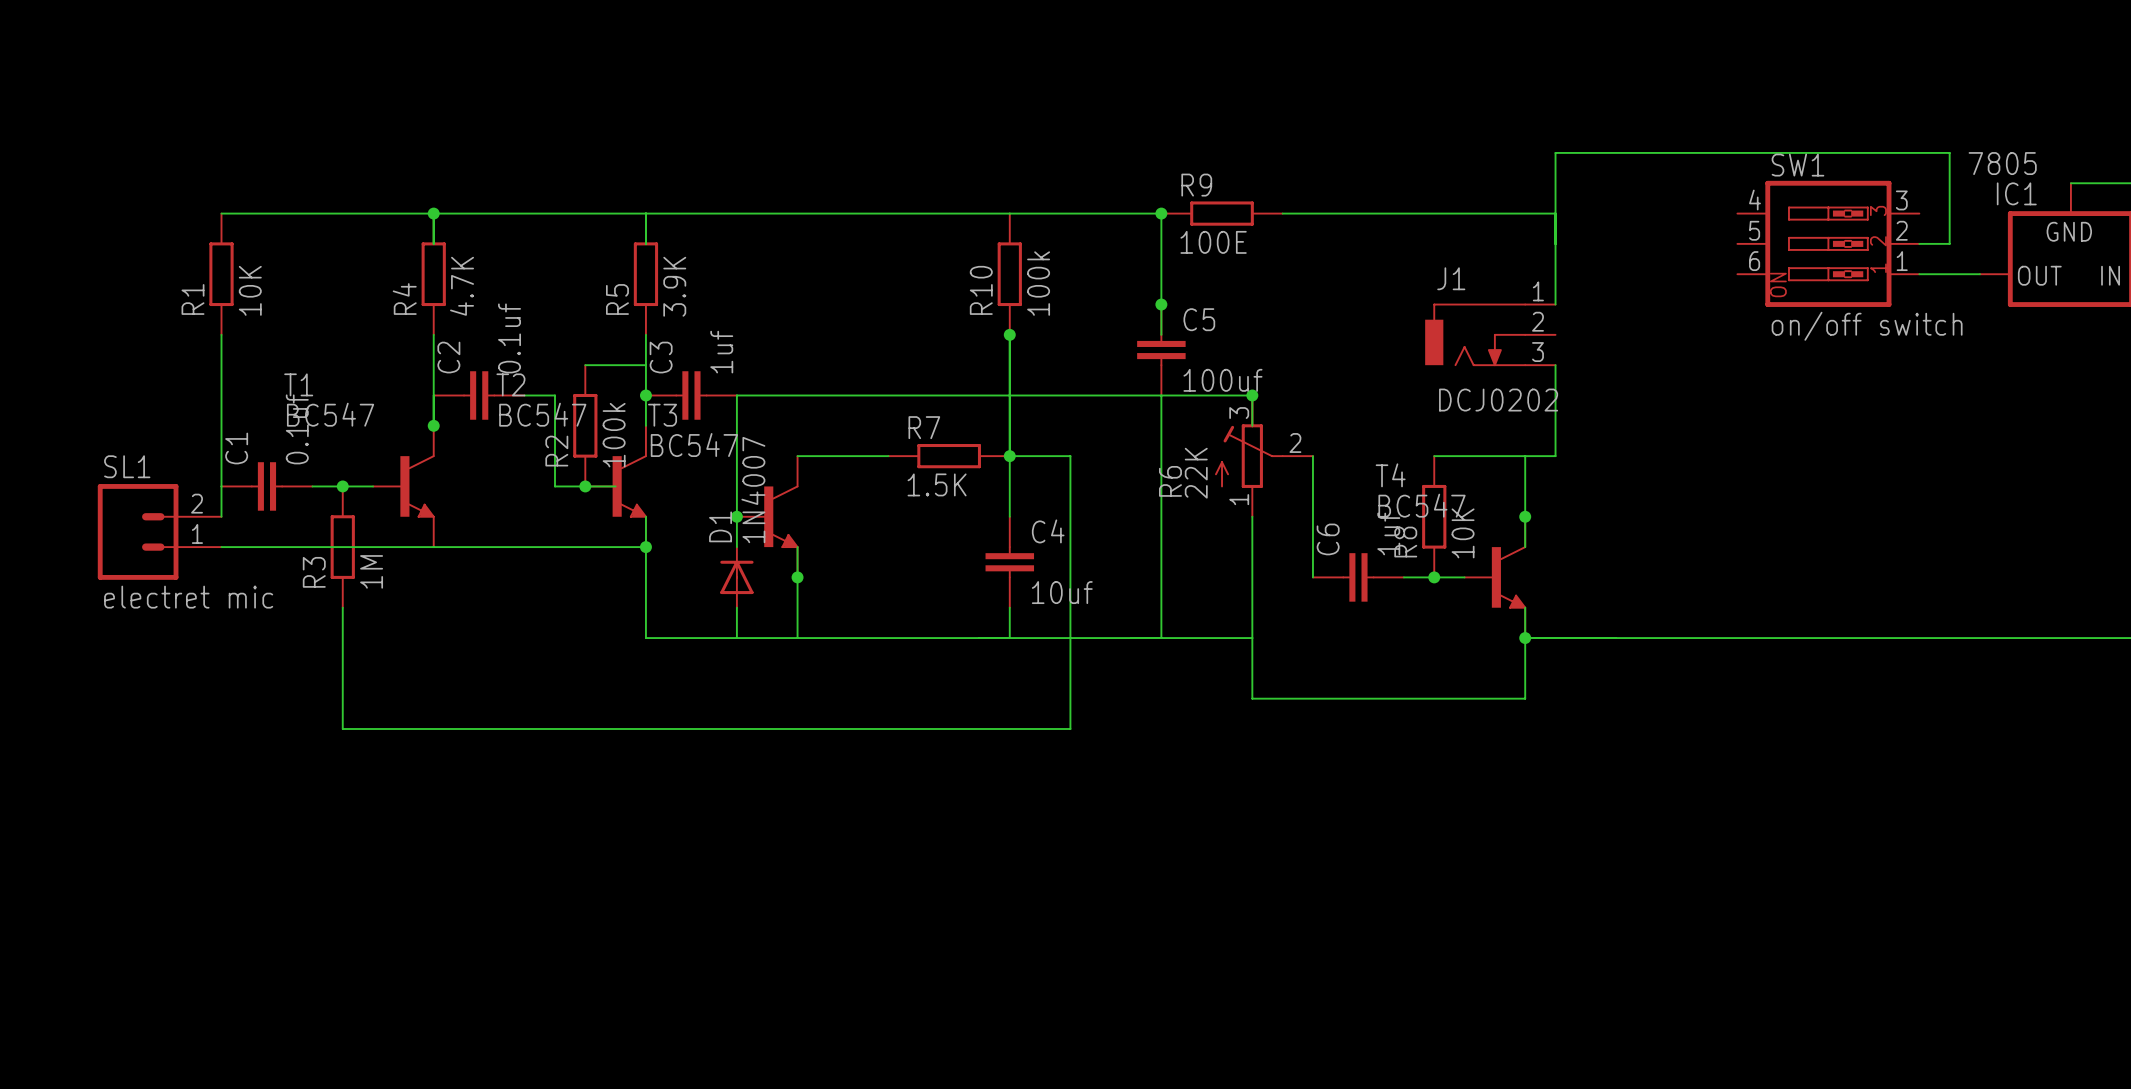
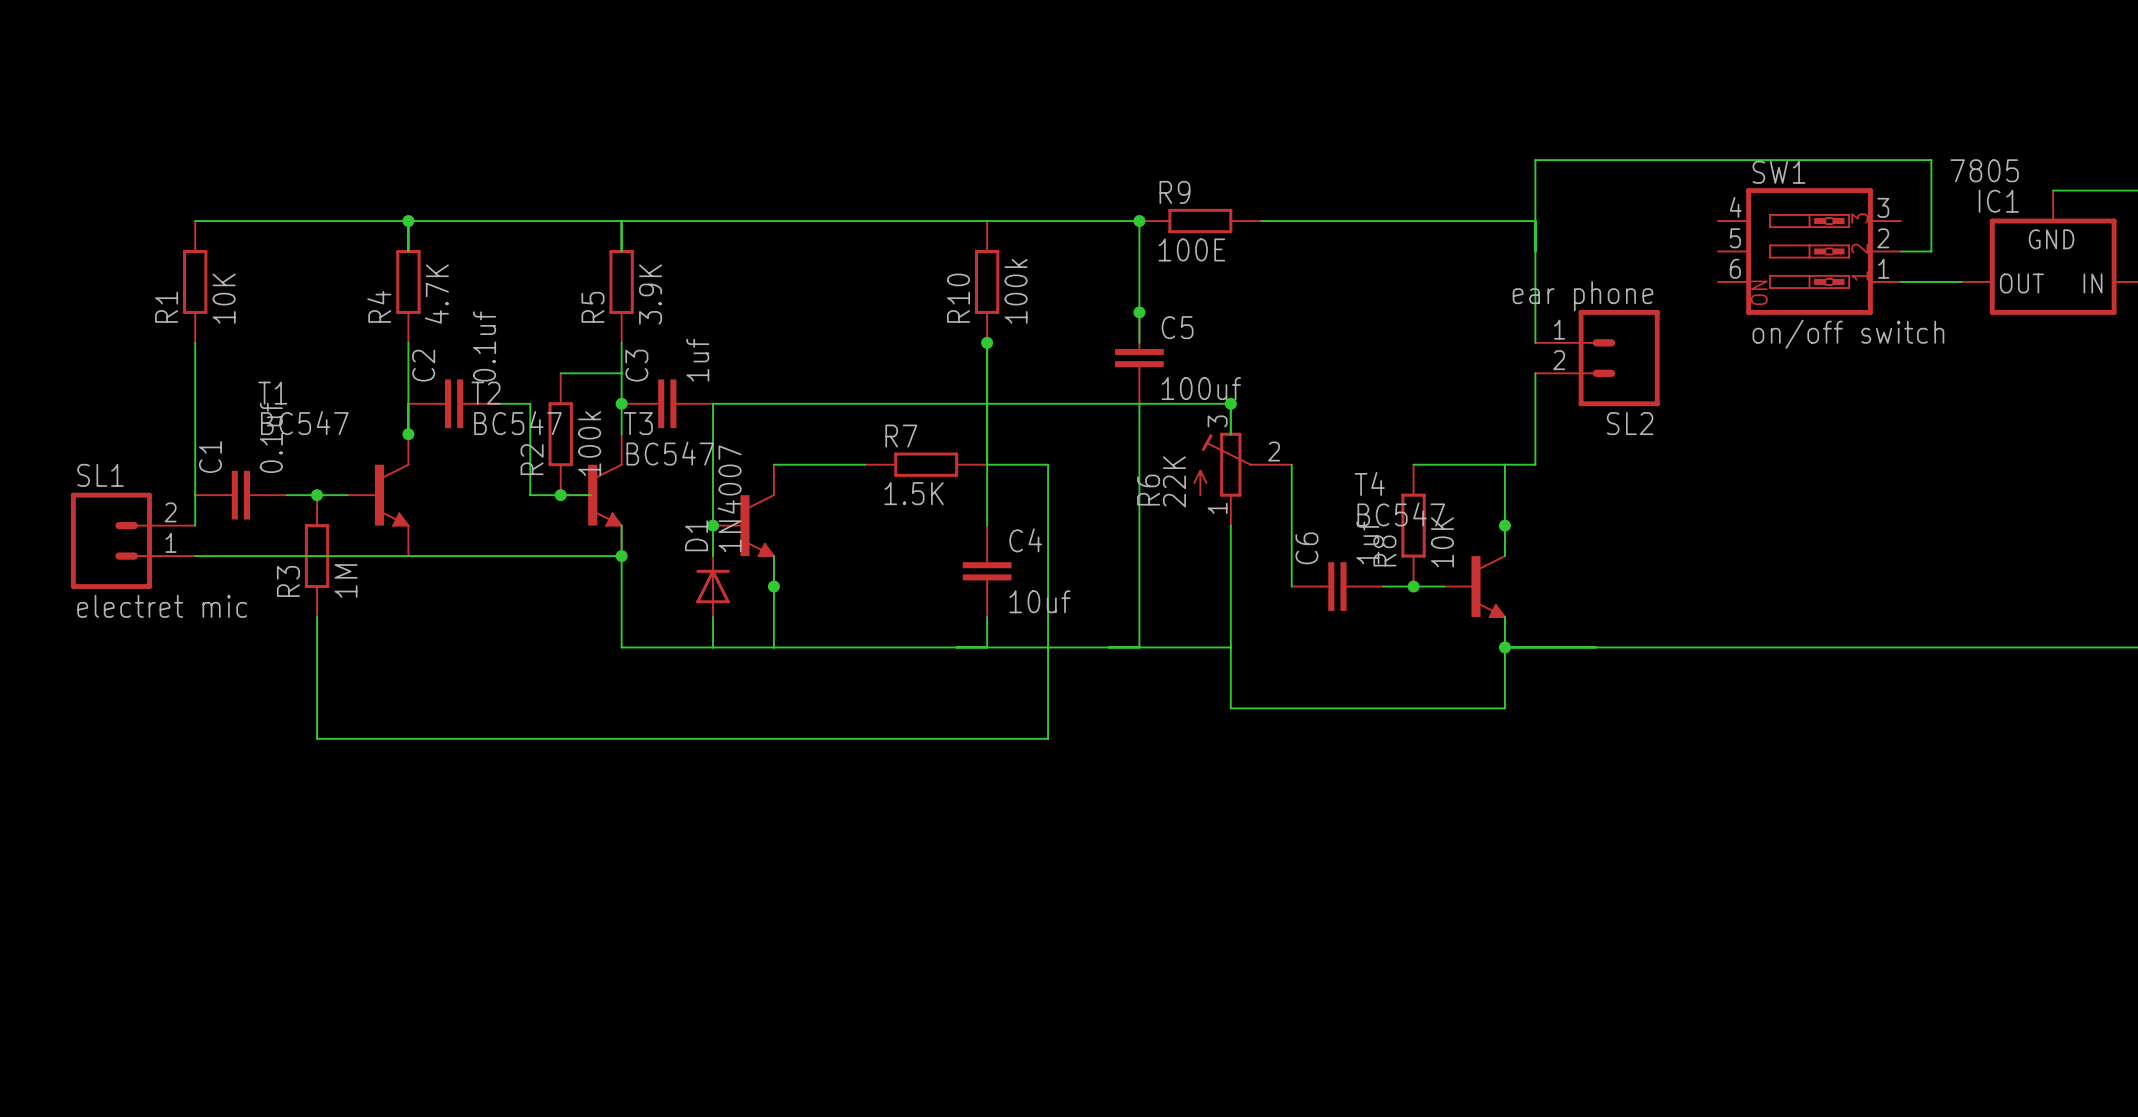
wire: none -> (1535, 312) (1535, 342)
J1: DCJ0202 (1490, 334) -> none
SL2: none -> ear phone (1597, 358)
junction: (1009, 456) -> none

